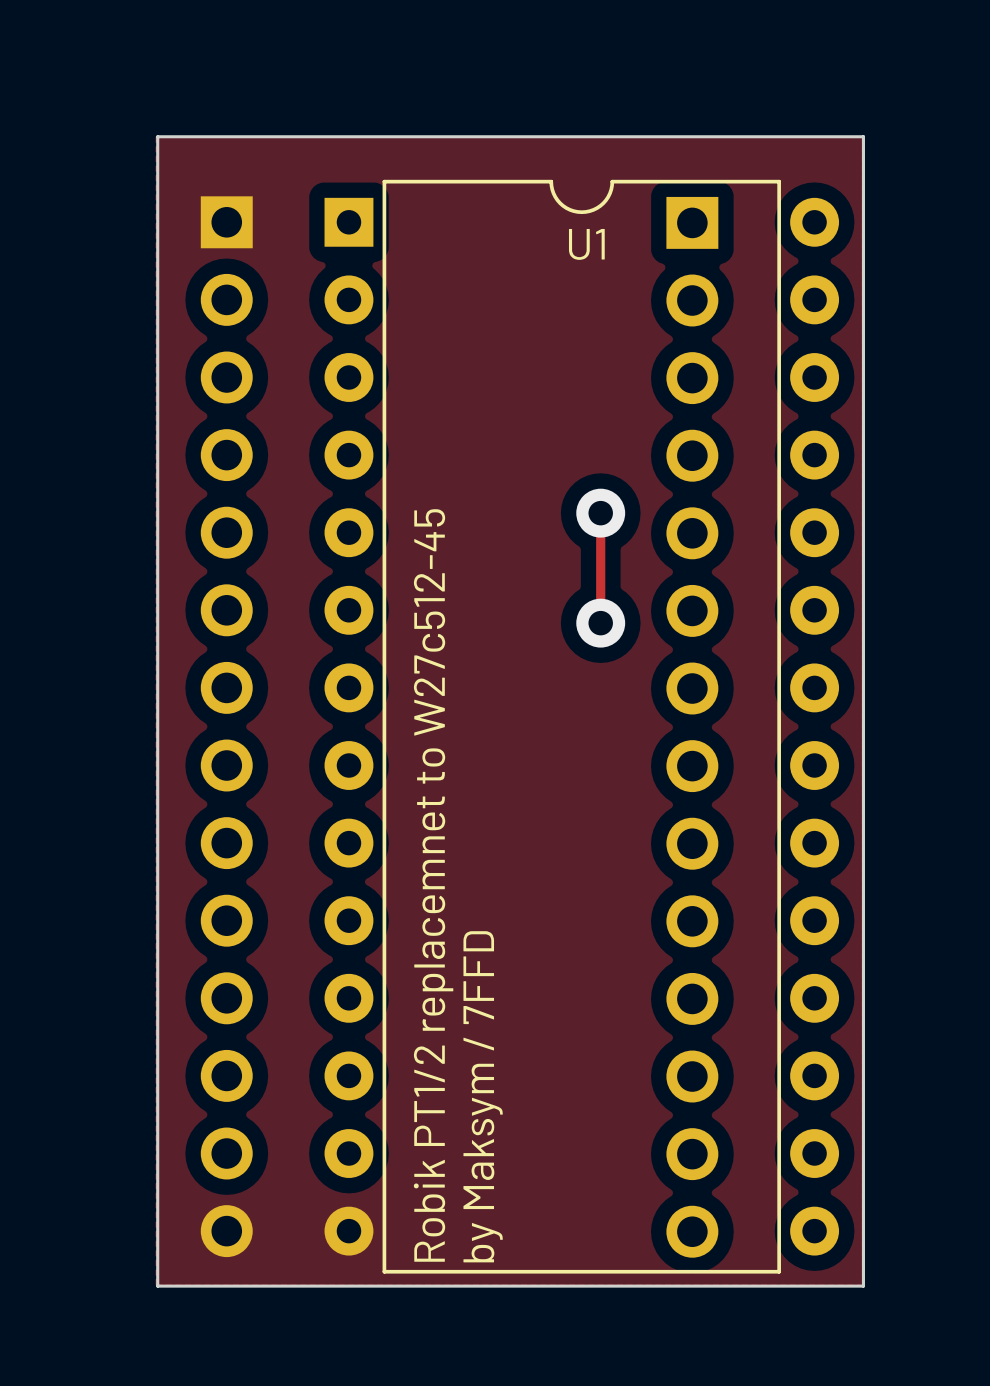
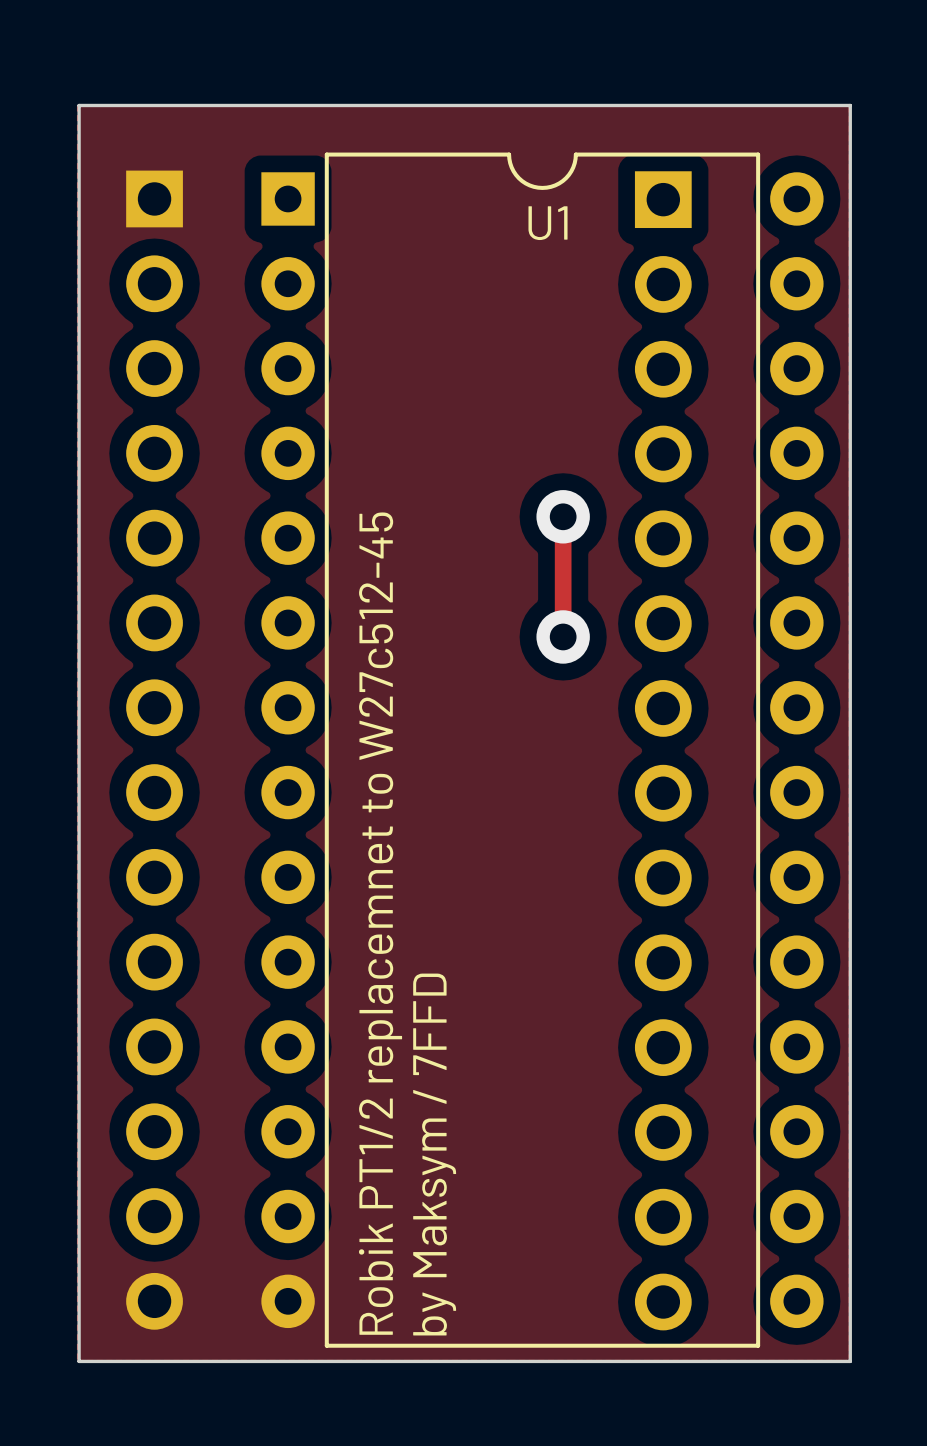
track width: thin (600, 513) (600, 623) -> thick (563, 516) (563, 636)

